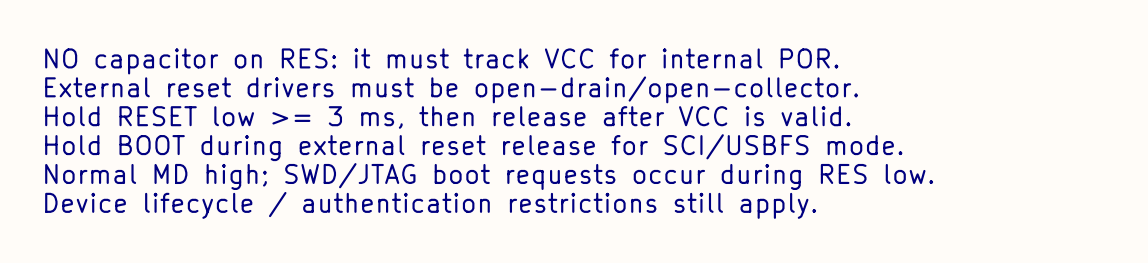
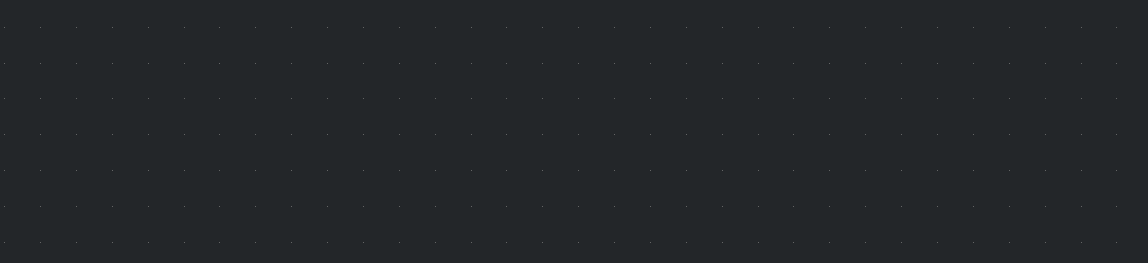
text: NO capacitor on RES: it must track VCC for internal POR. (441, 61) -> none
text: External reset drivers must be open-drain/open-collector. (451, 89) -> none
text: Hold RESET low >= 3 ms, then release after VCC is valid. (447, 117) -> none
text: Hold BOOT during external reset release for SCI/USBFS mode. (473, 147) -> none
text: Normal MD high; SWD/JTAG boot requests occur during RES low. (489, 176) -> none
text: Device lifecycle / authentication restrictions still apply. (430, 205) -> none

